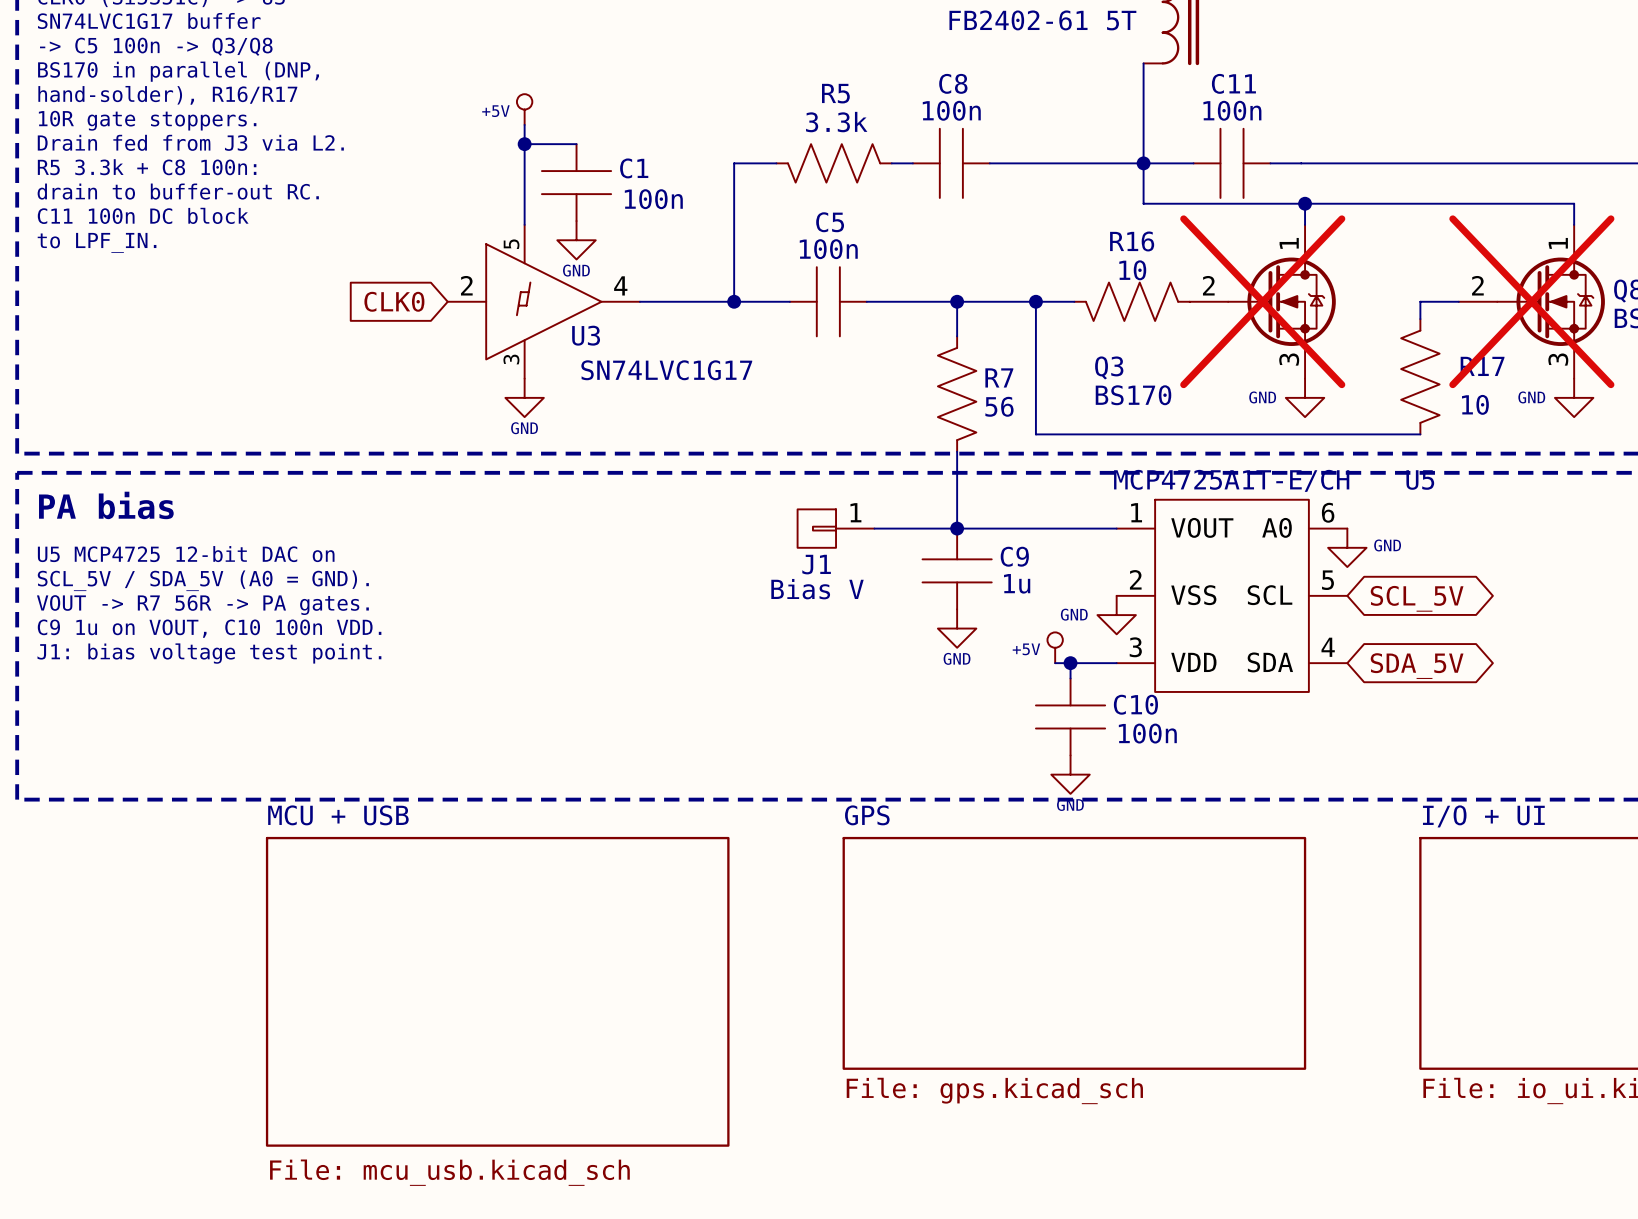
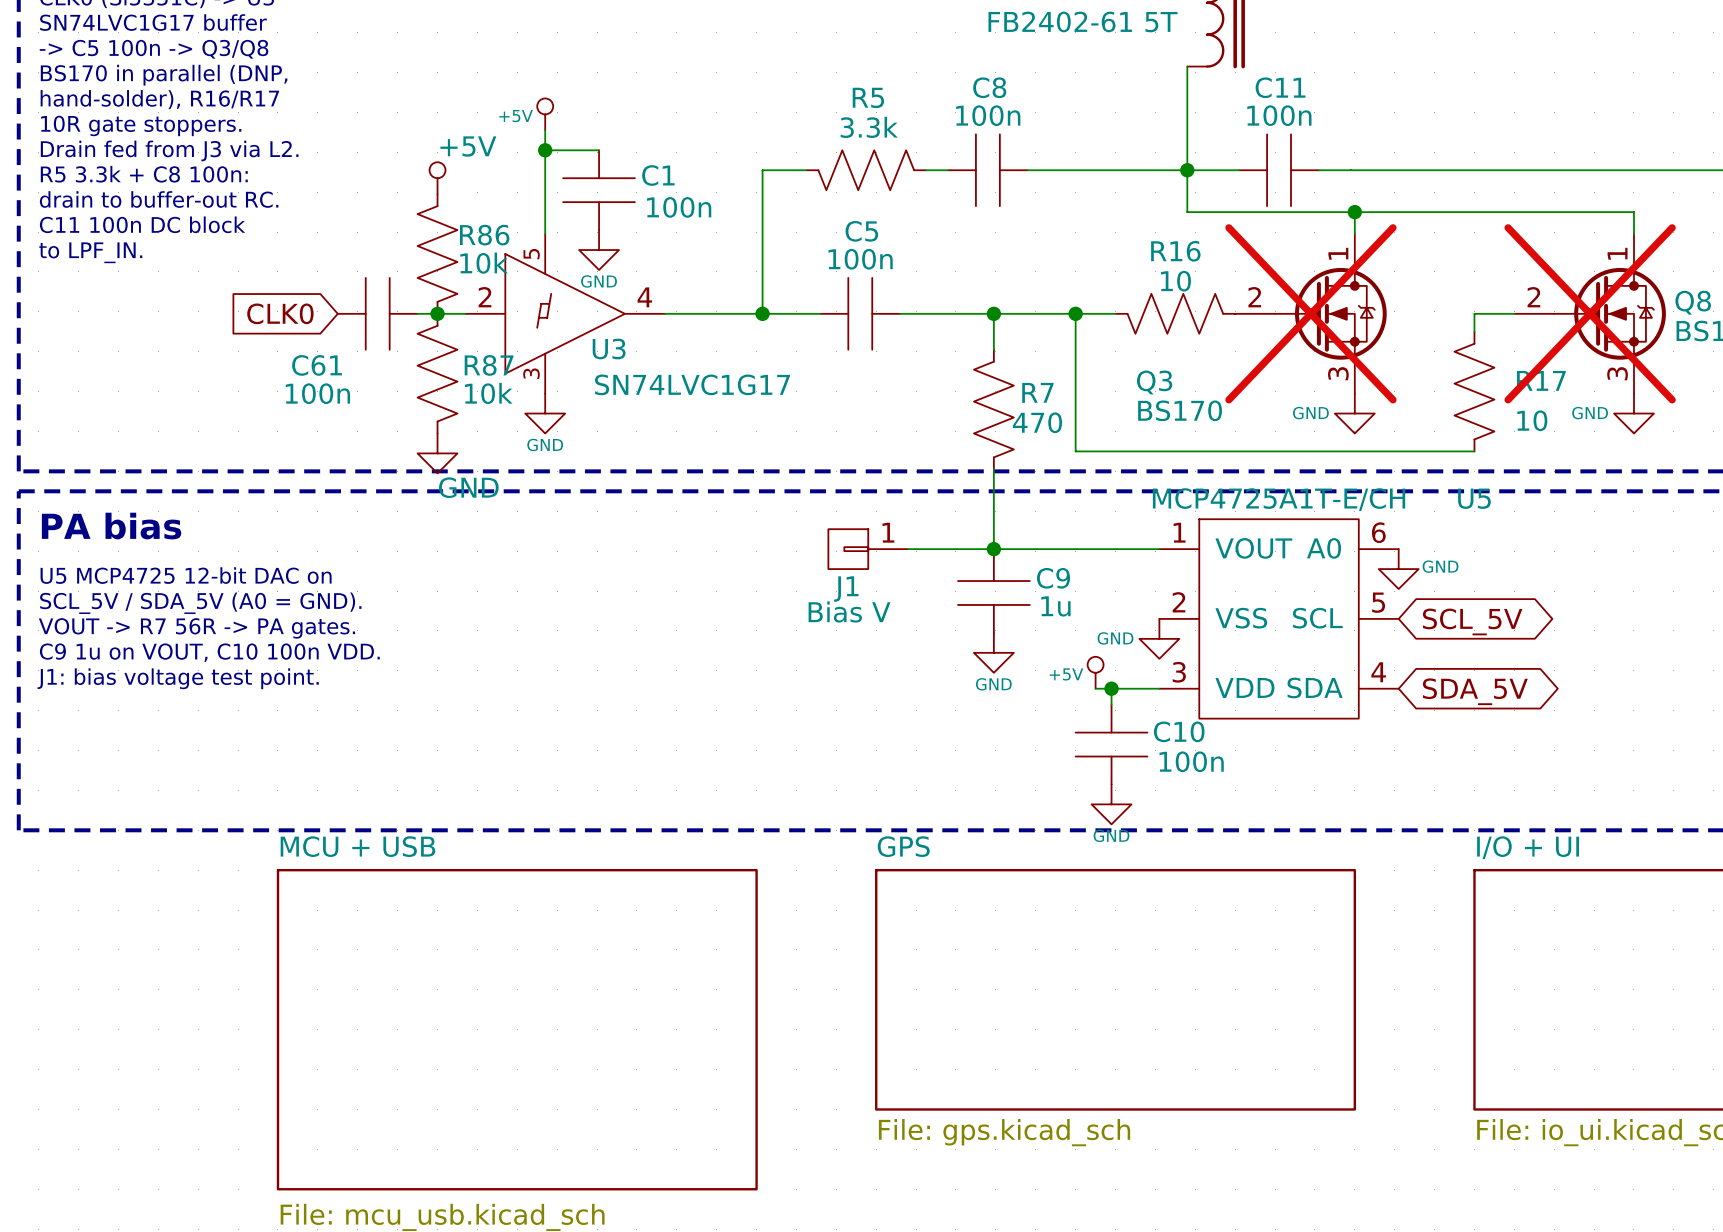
power symbol: none -> +5V (437, 178)
R86: none -> 10k (437, 254)
C61: none -> 100n (377, 313)
global label position: CLK0 (394, 301) -> CLK0 (280, 313)
wire: none -> (417, 313) (465, 313)
junction: none -> (437, 313)
R87: none -> 10k (437, 373)
R7 value: 56 (999, 406) -> 470 (1037, 422)
power symbol: none -> GND (437, 453)

